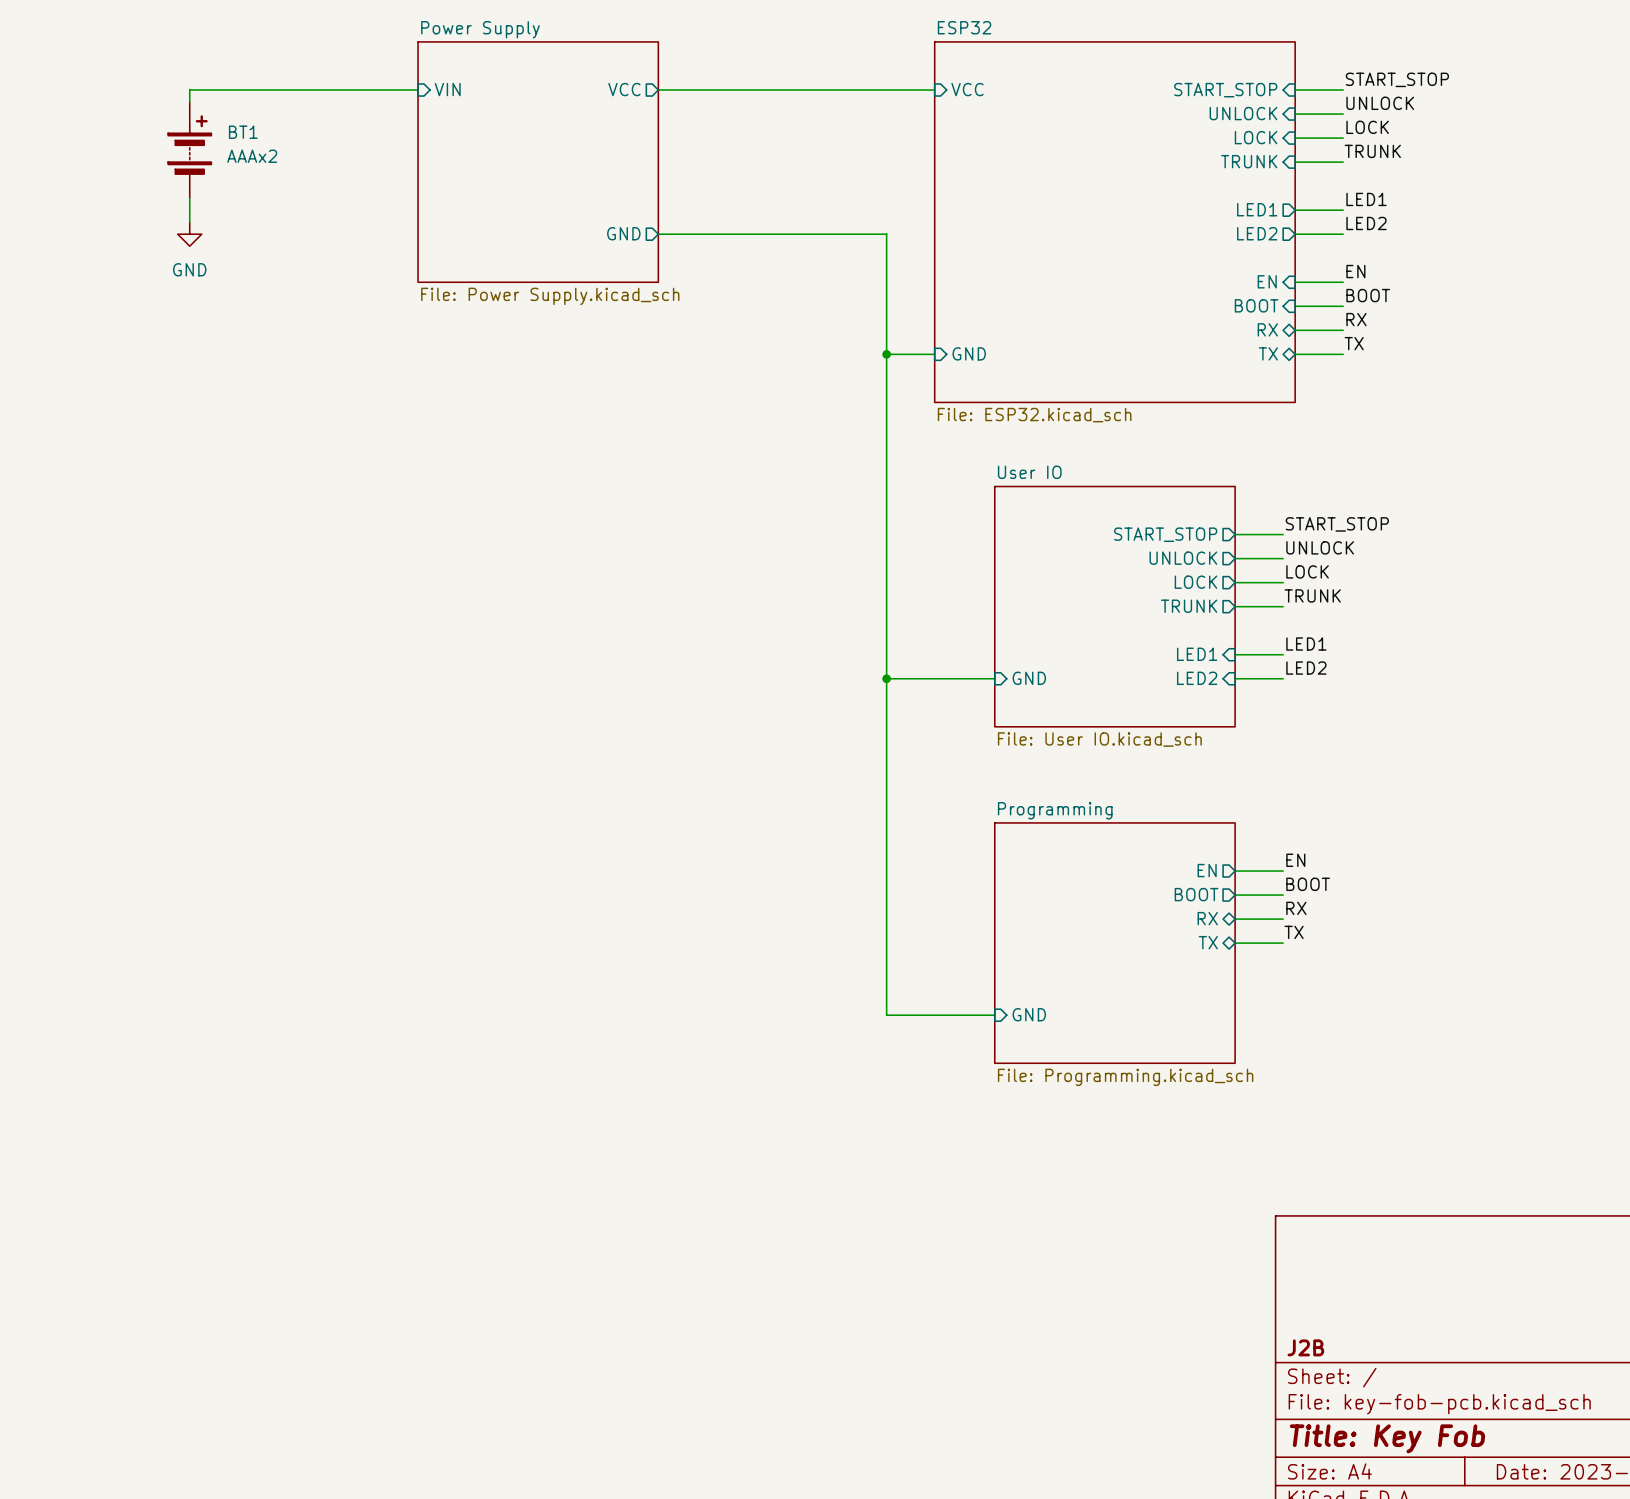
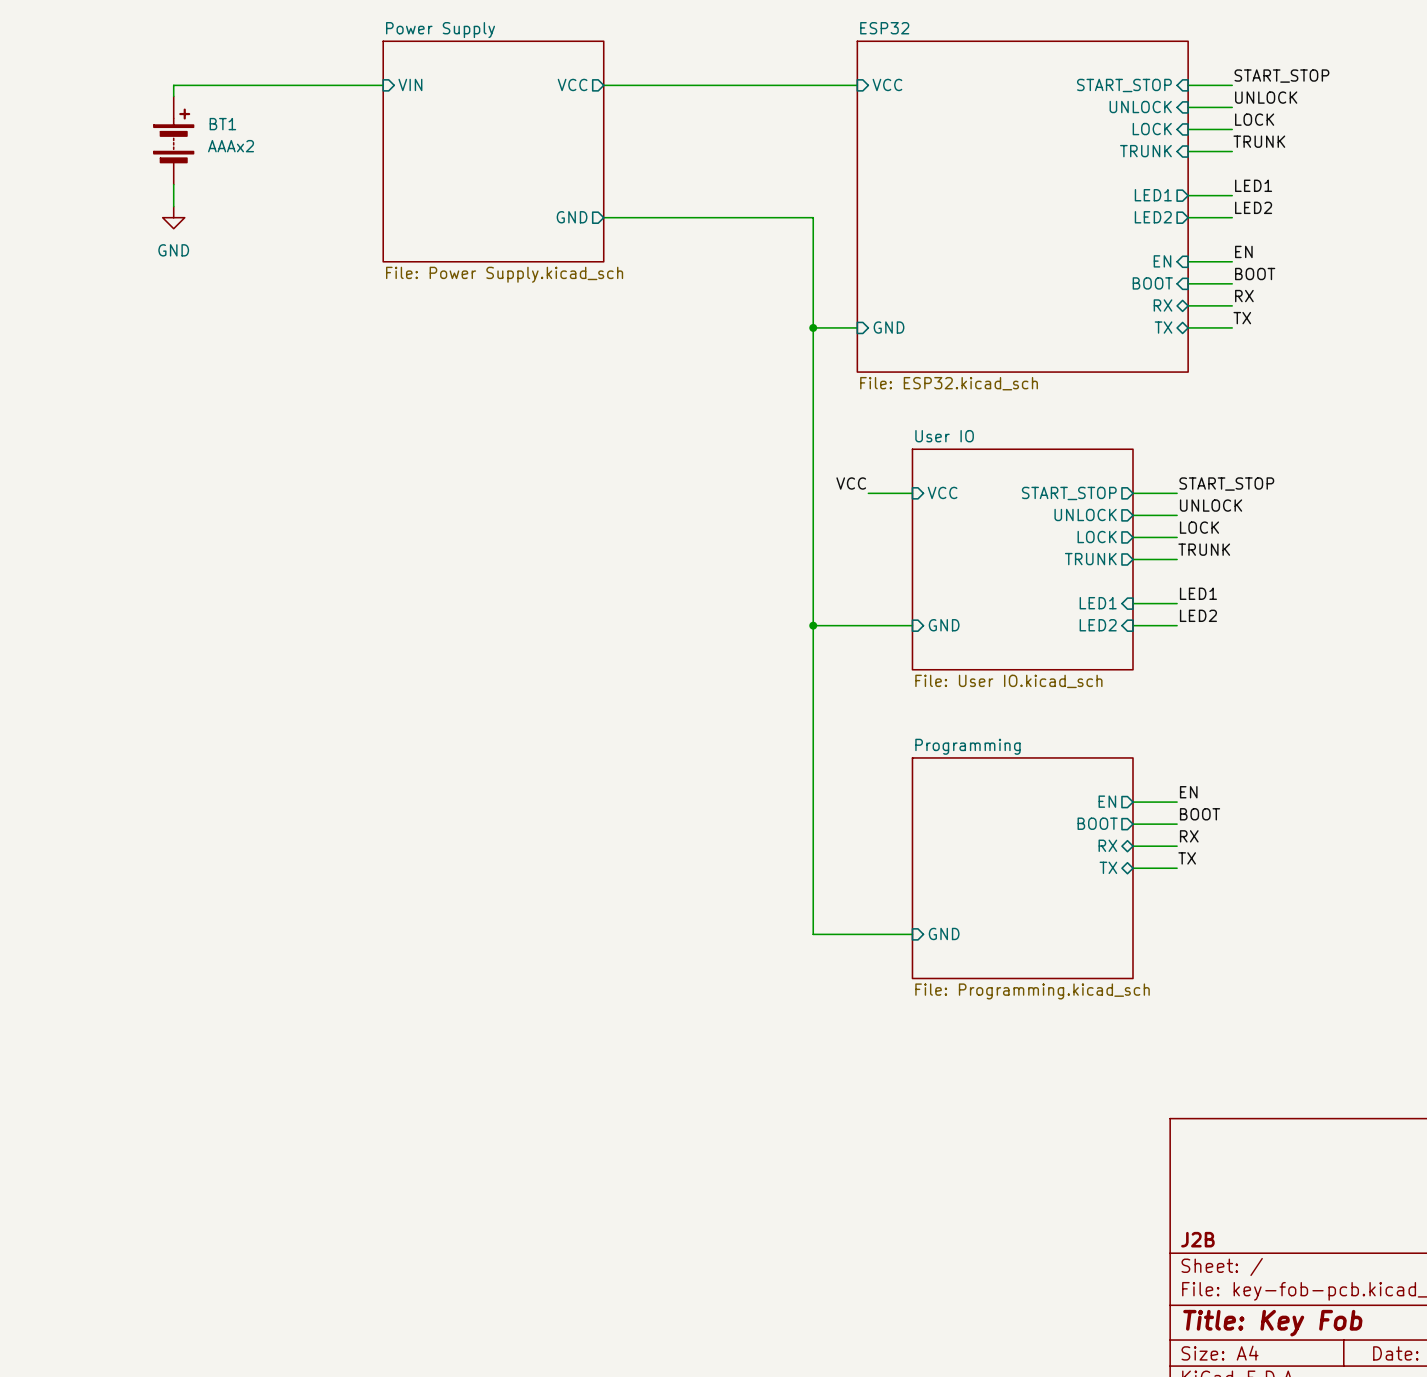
label: none -> VCC (851, 483)
wire: none -> (868, 493) (912, 493)
sheet pin: none -> VCC (942, 492)

